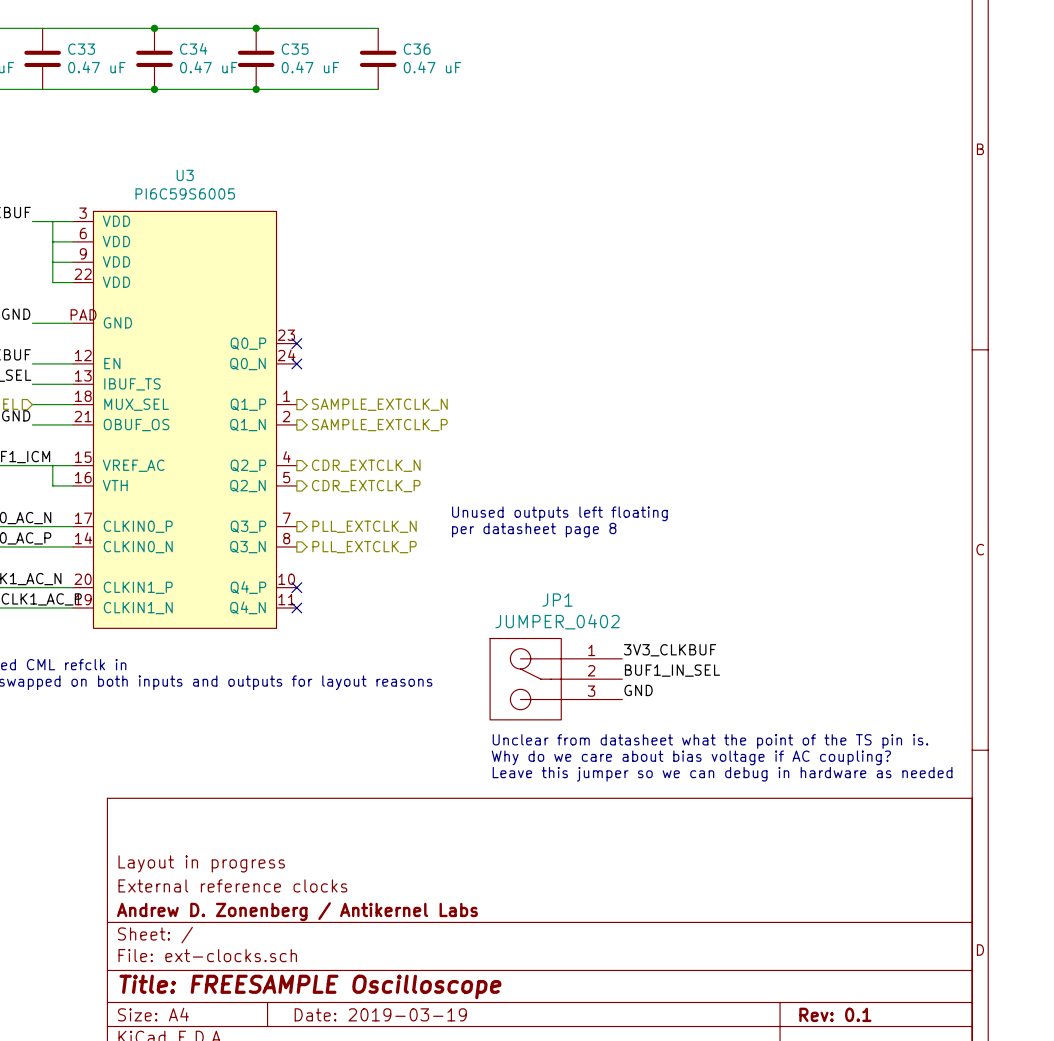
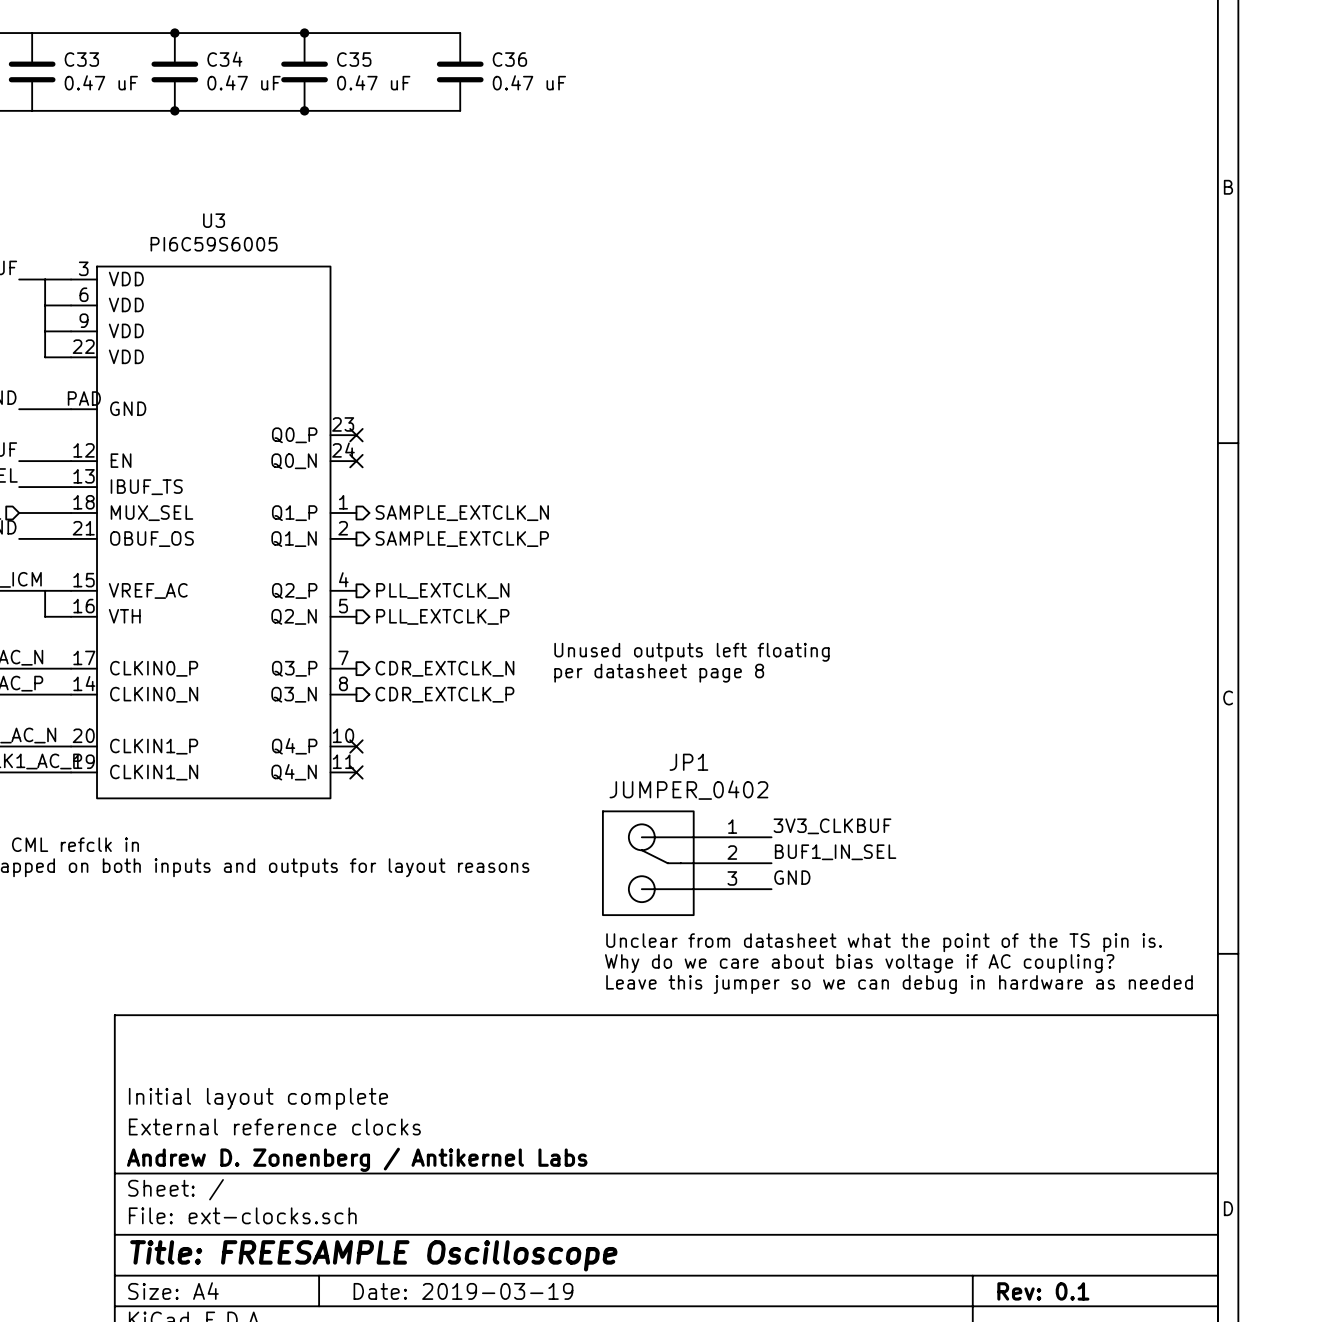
hierarchical label: CDR_EXTCLK_N (366, 465) -> PLL_EXTCLK_N (442, 590)
hierarchical label: CDR_EXTCLK_P (366, 486) -> PLL_EXTCLK_P (442, 616)
hierarchical label: PLL_EXTCLK_N (364, 526) -> CDR_EXTCLK_N (444, 668)
hierarchical label: PLL_EXTCLK_P (364, 547) -> CDR_EXTCLK_P (444, 694)
title block: Layout in progress (201, 863) -> Initial layout complete (258, 1098)

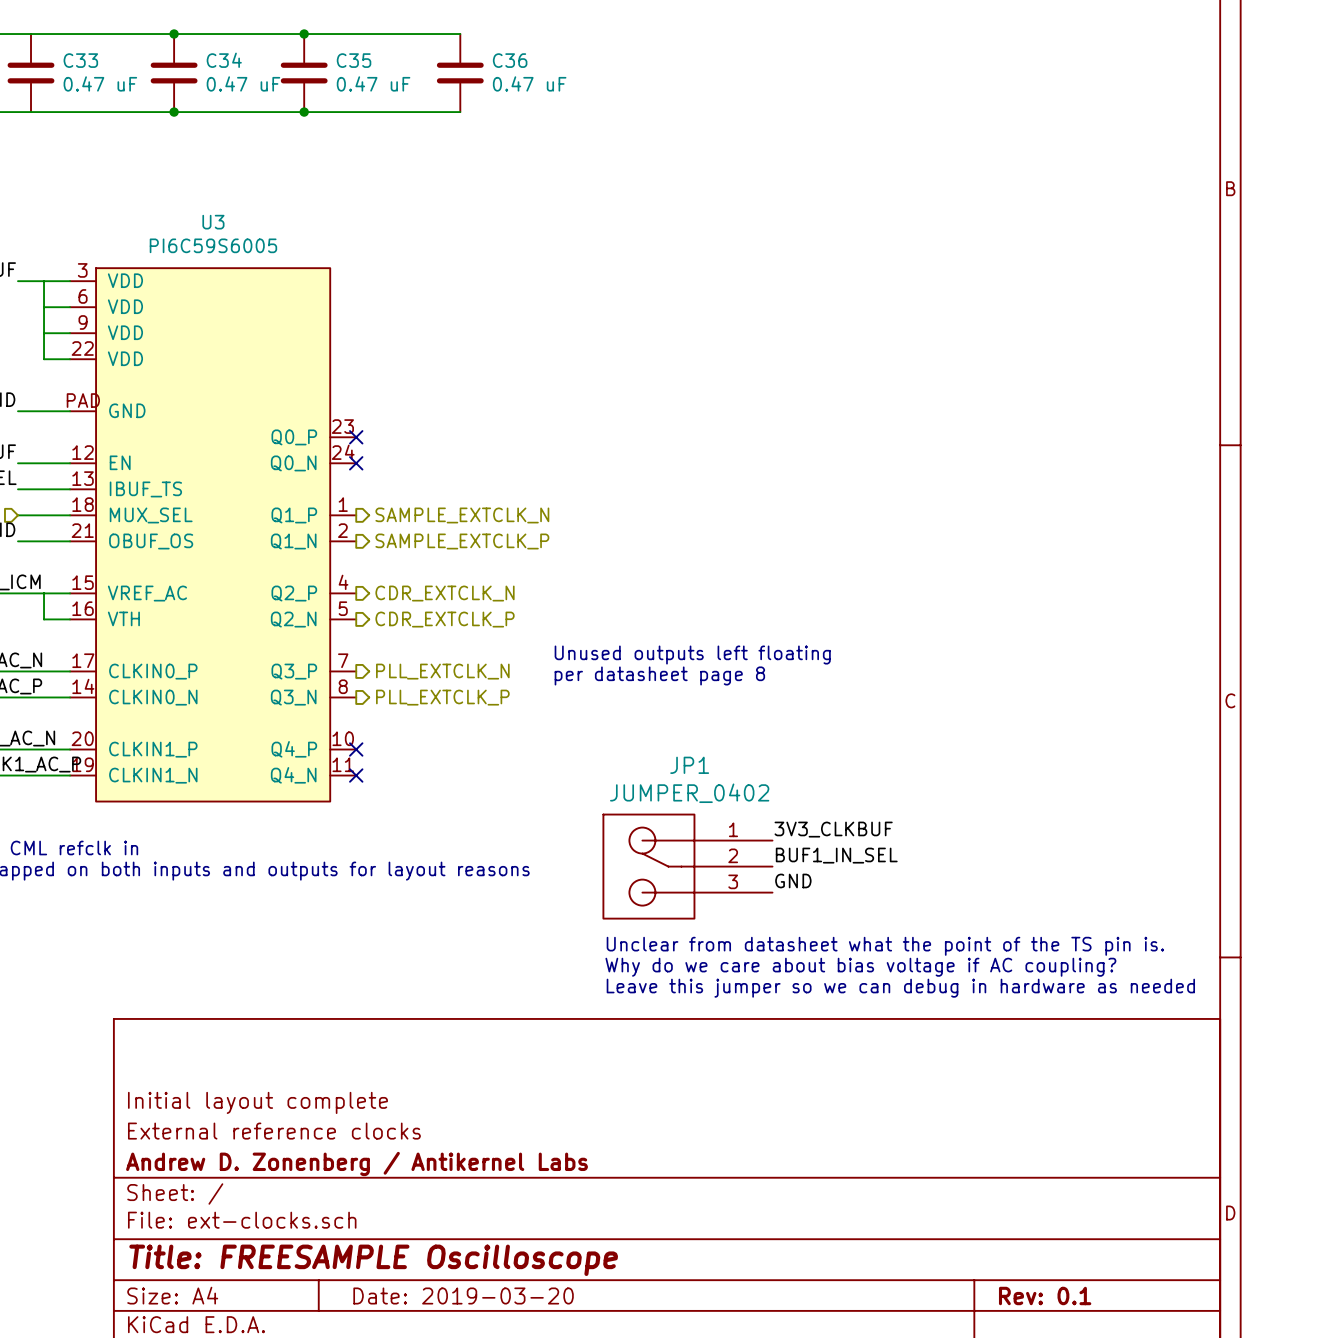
hierarchical label: PLL_EXTCLK_N (442, 590) -> CDR_EXTCLK_N (445, 593)
hierarchical label: PLL_EXTCLK_P (442, 616) -> CDR_EXTCLK_P (445, 619)
hierarchical label: CDR_EXTCLK_N (444, 668) -> PLL_EXTCLK_N (442, 671)
hierarchical label: CDR_EXTCLK_P (444, 694) -> PLL_EXTCLK_P (442, 697)
title block: Date: 2019-03-19 (463, 1291) -> Date: 2019-03-20 (463, 1295)

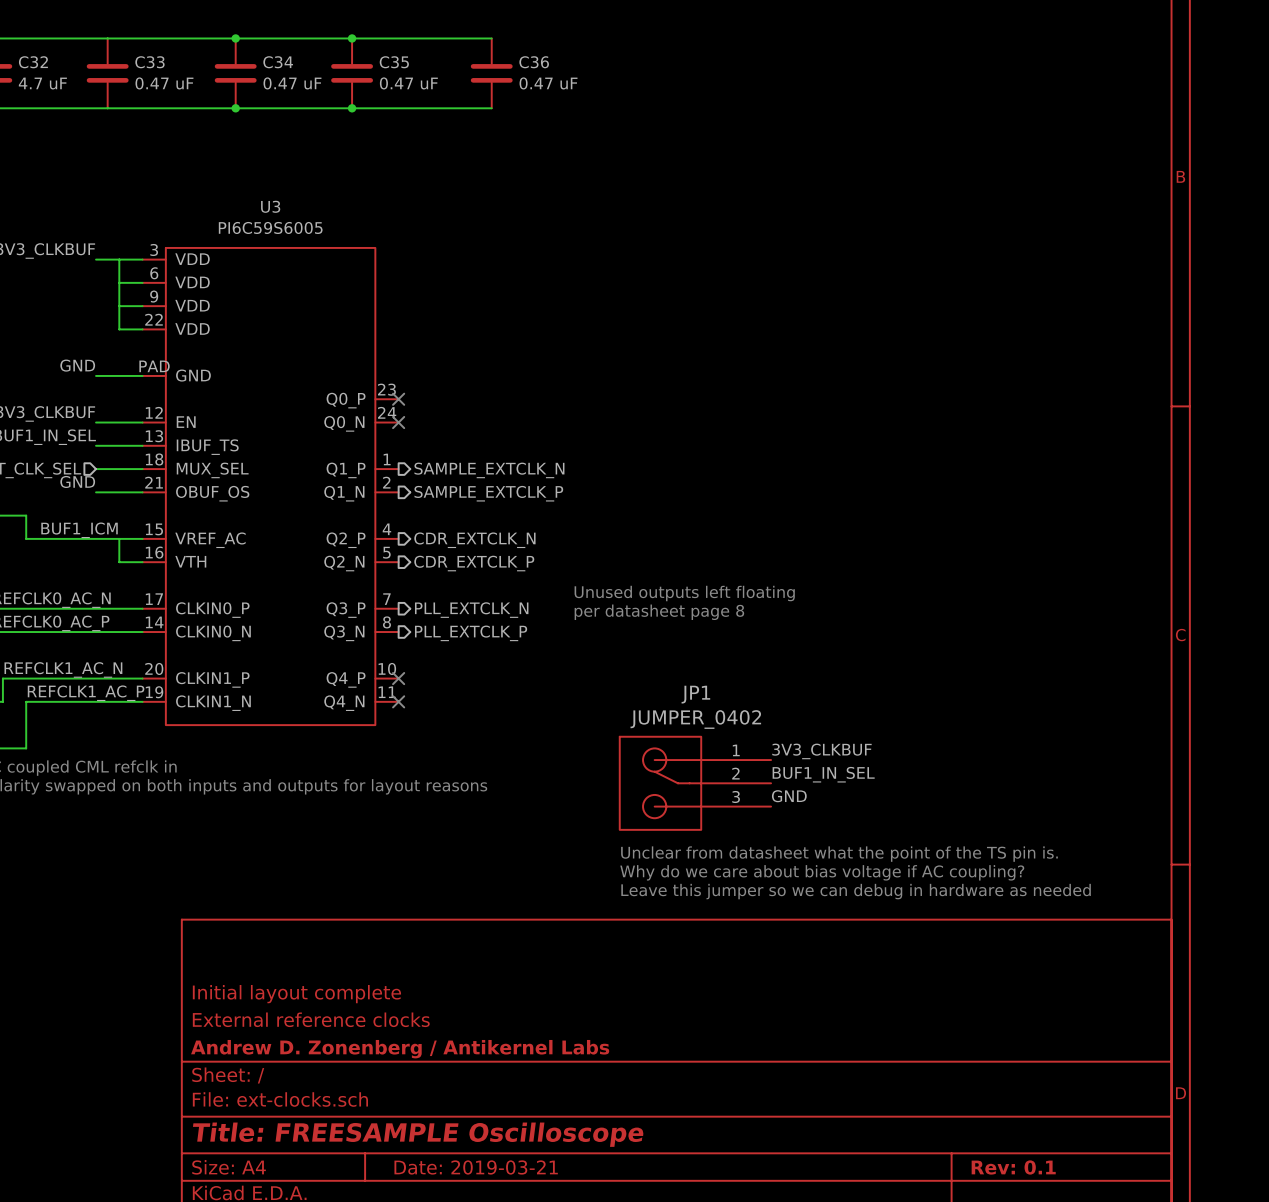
title block: Date: 2019-03-20 (463, 1295) -> Date: 2019-03-21 (476, 1167)

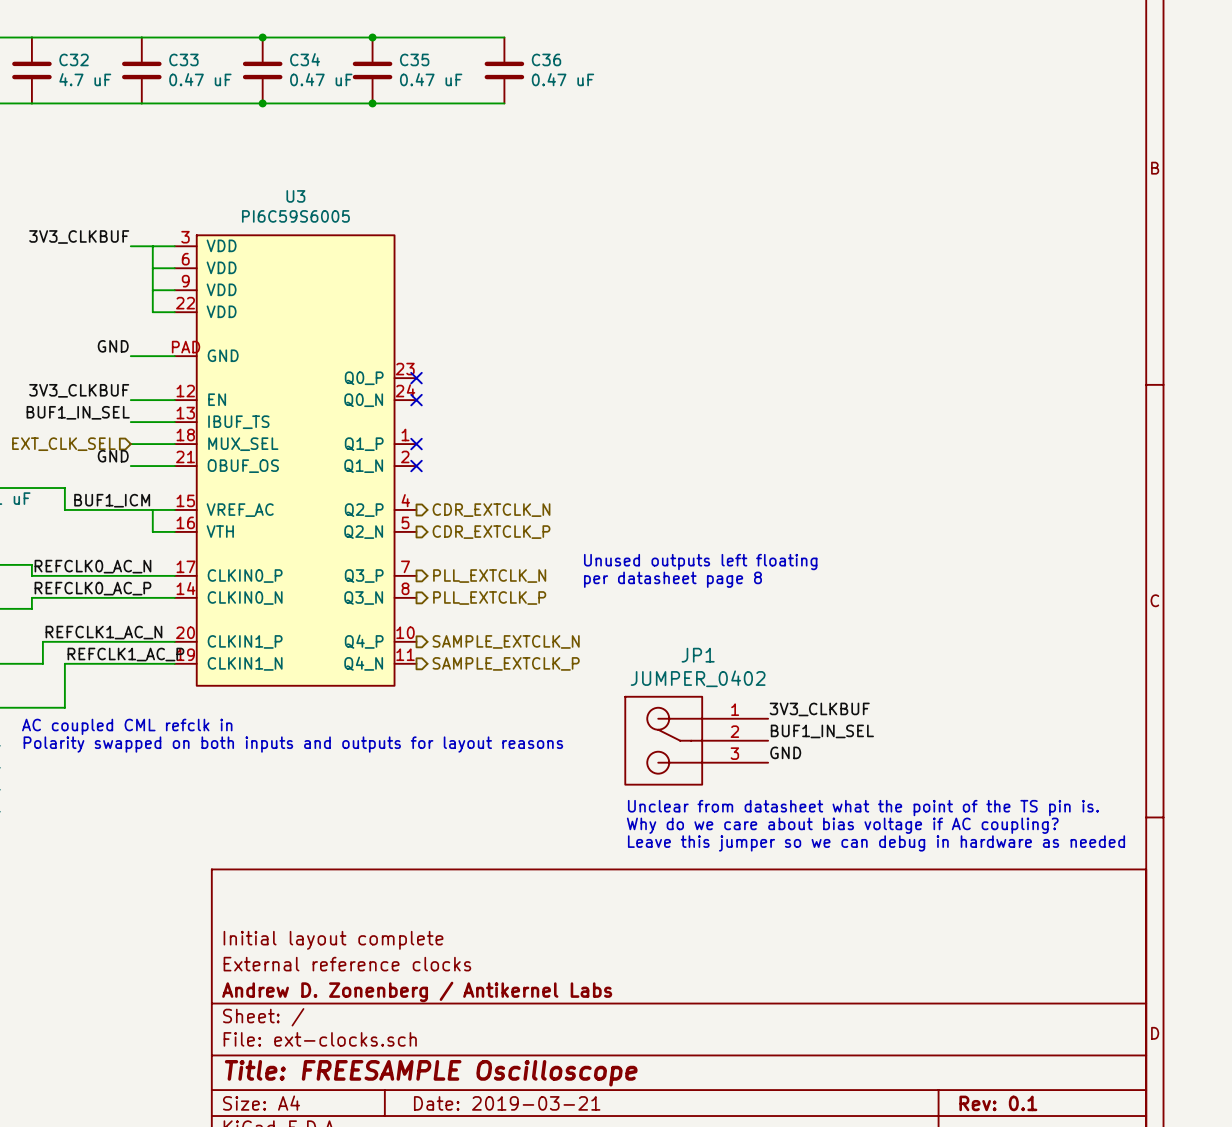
no-connect mark: none -> (416, 444)
hierarchical label position: SAMPLE_EXTCLK_N (489, 470) -> SAMPLE_EXTCLK_N (506, 641)
no-connect mark: none -> (416, 466)
hierarchical label position: SAMPLE_EXTCLK_P (488, 493) -> SAMPLE_EXTCLK_P (506, 663)
no-connect mark: (398, 678) -> none
no-connect mark: (398, 701) -> none

